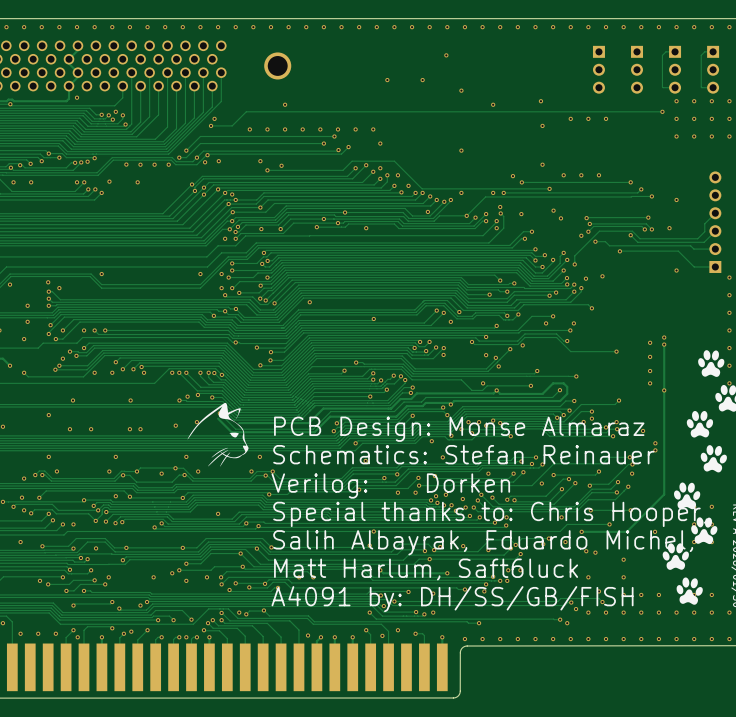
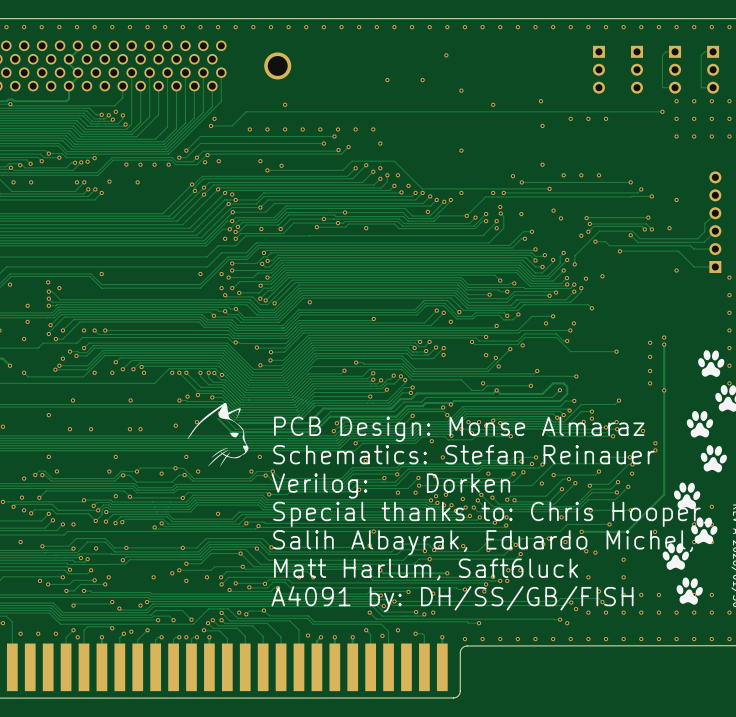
via: (77, 97) -> none

